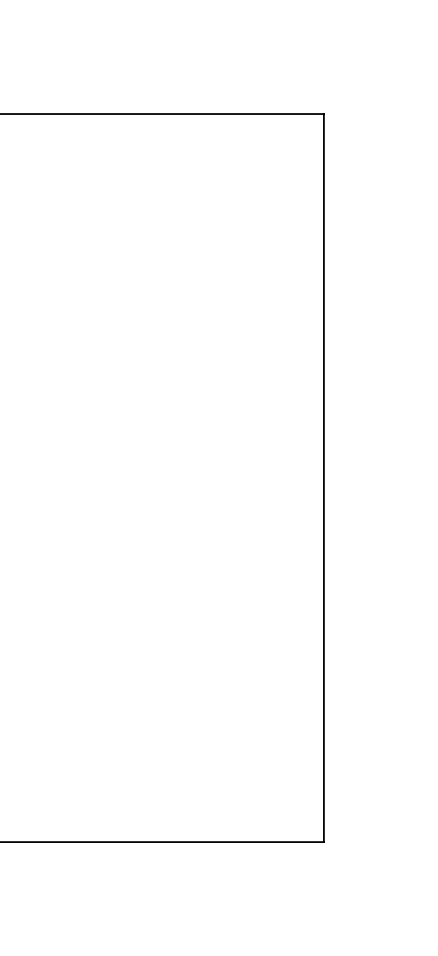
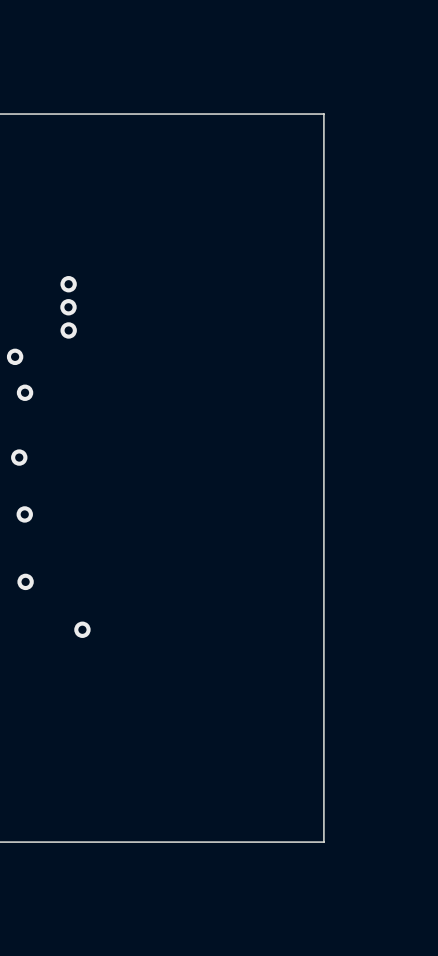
via: none -> (68, 284)
via: none -> (68, 307)
via: none -> (68, 330)
via: none -> (15, 356)
via: none -> (25, 392)
via: none -> (19, 457)
via: none -> (24, 514)
via: none -> (25, 581)
via: none -> (82, 629)

